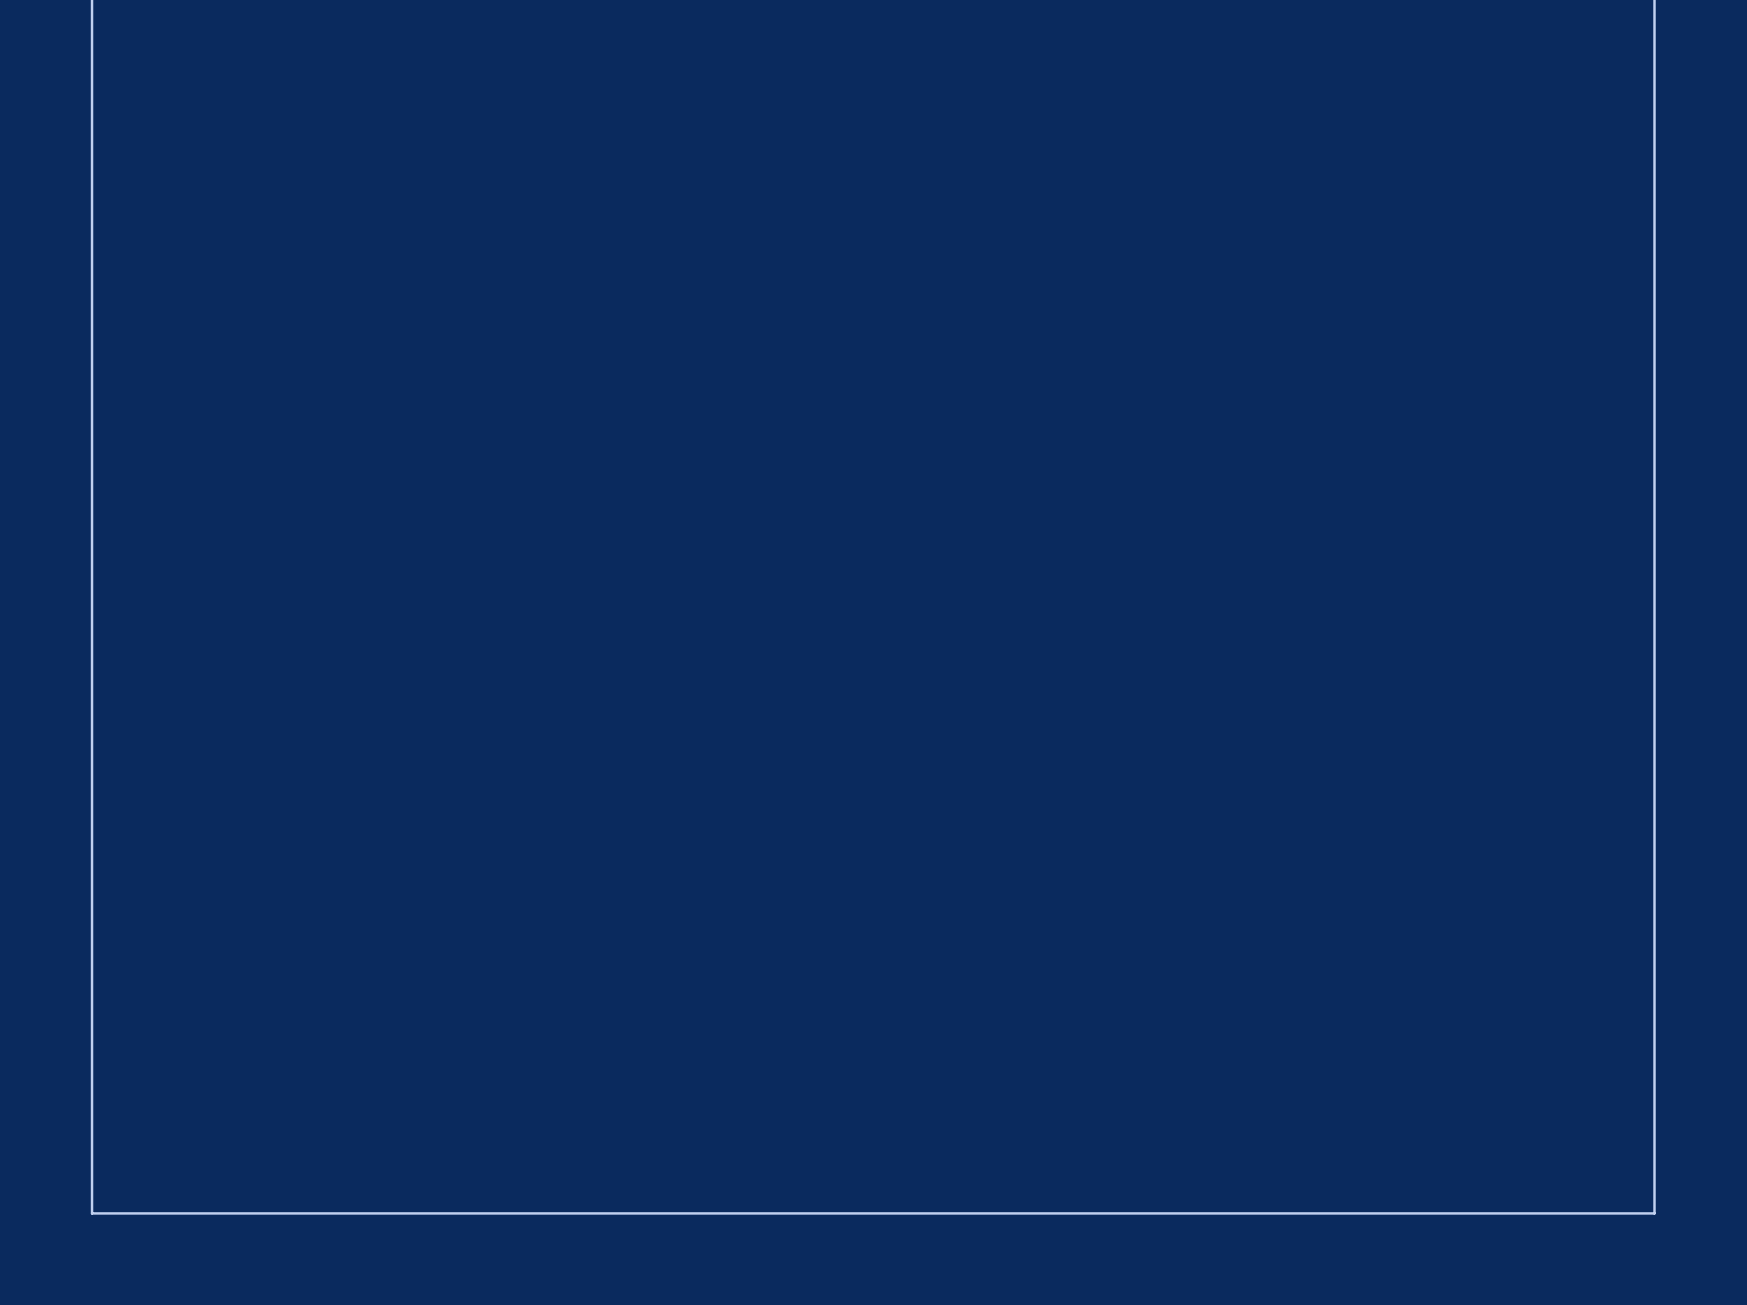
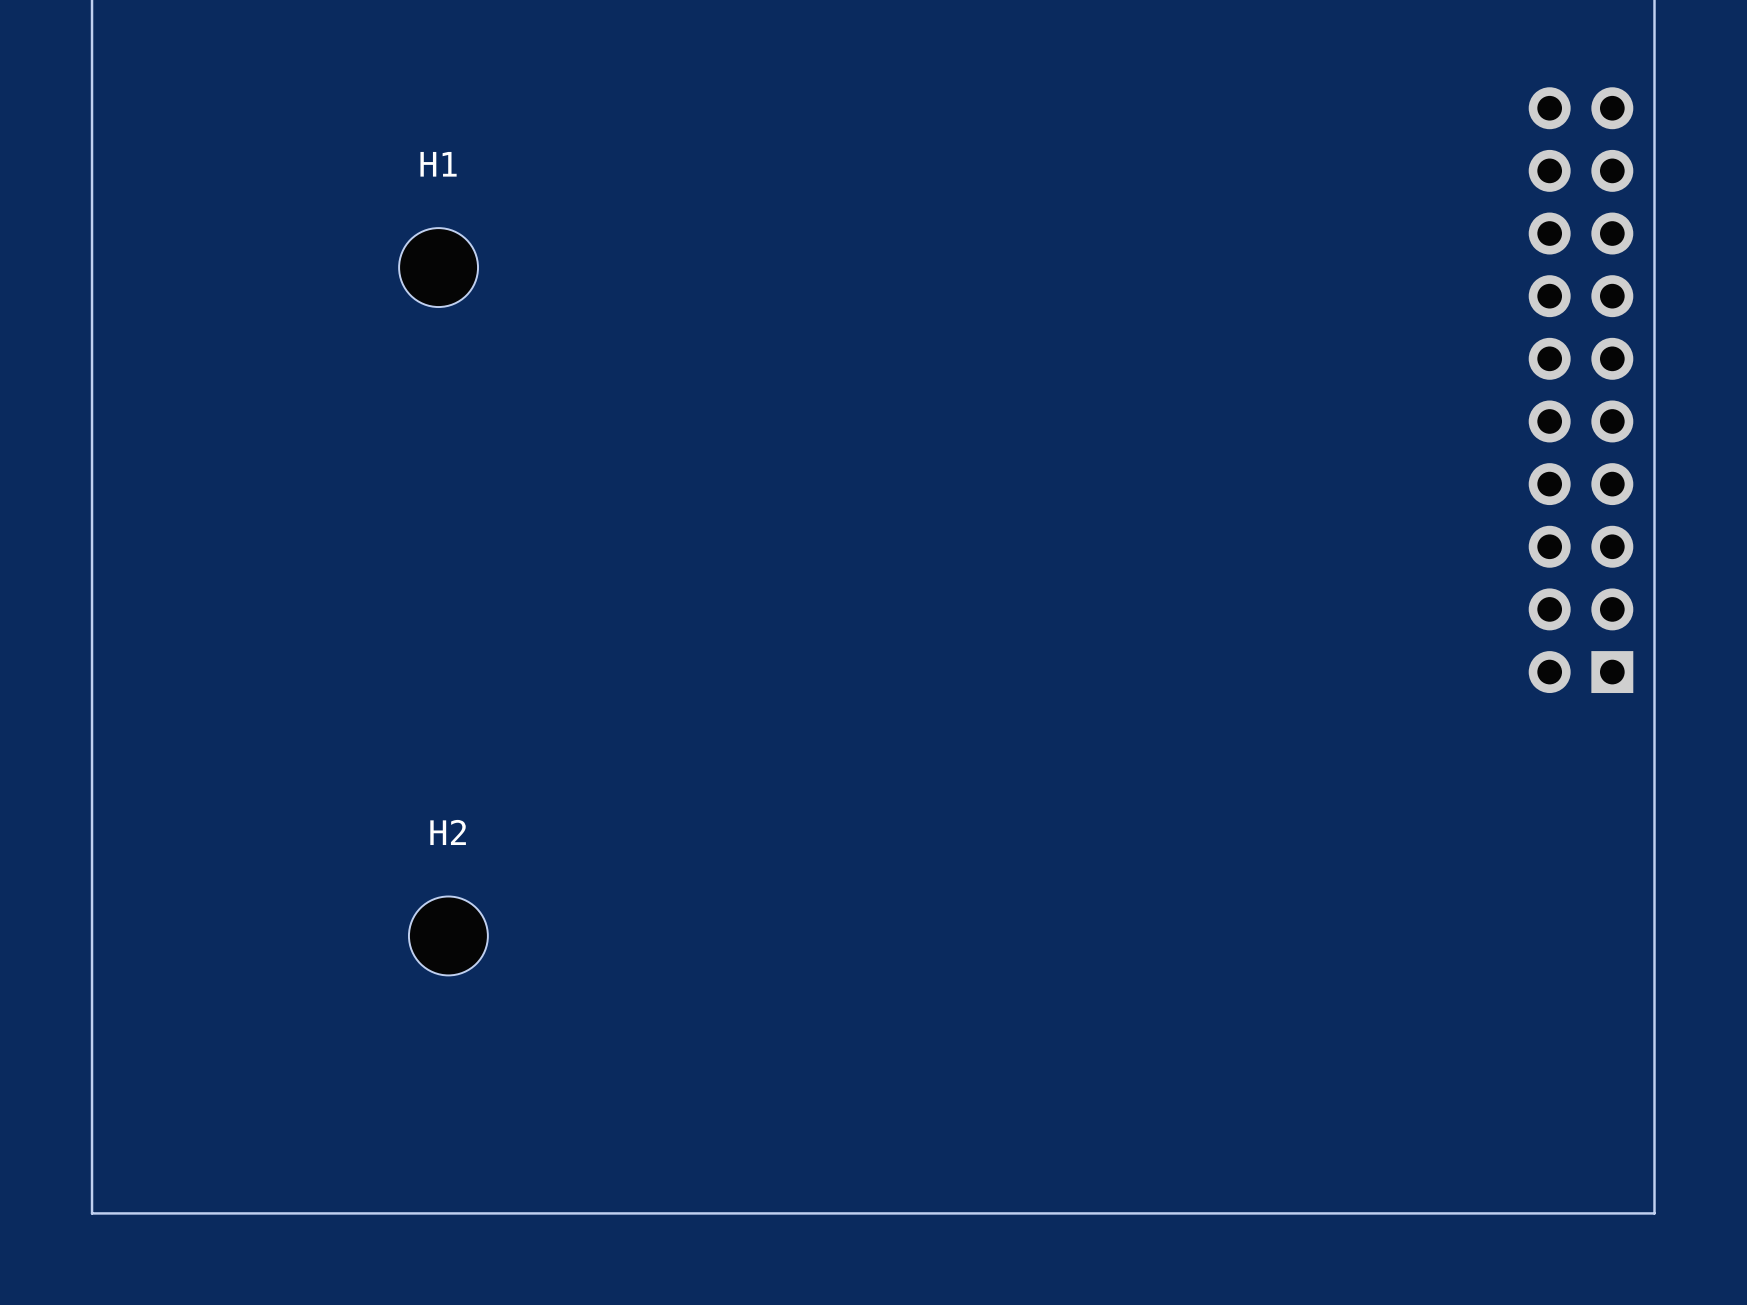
H1: none -> (438, 267)
part: none -> (1581, 390)
H2: none -> (448, 935)

